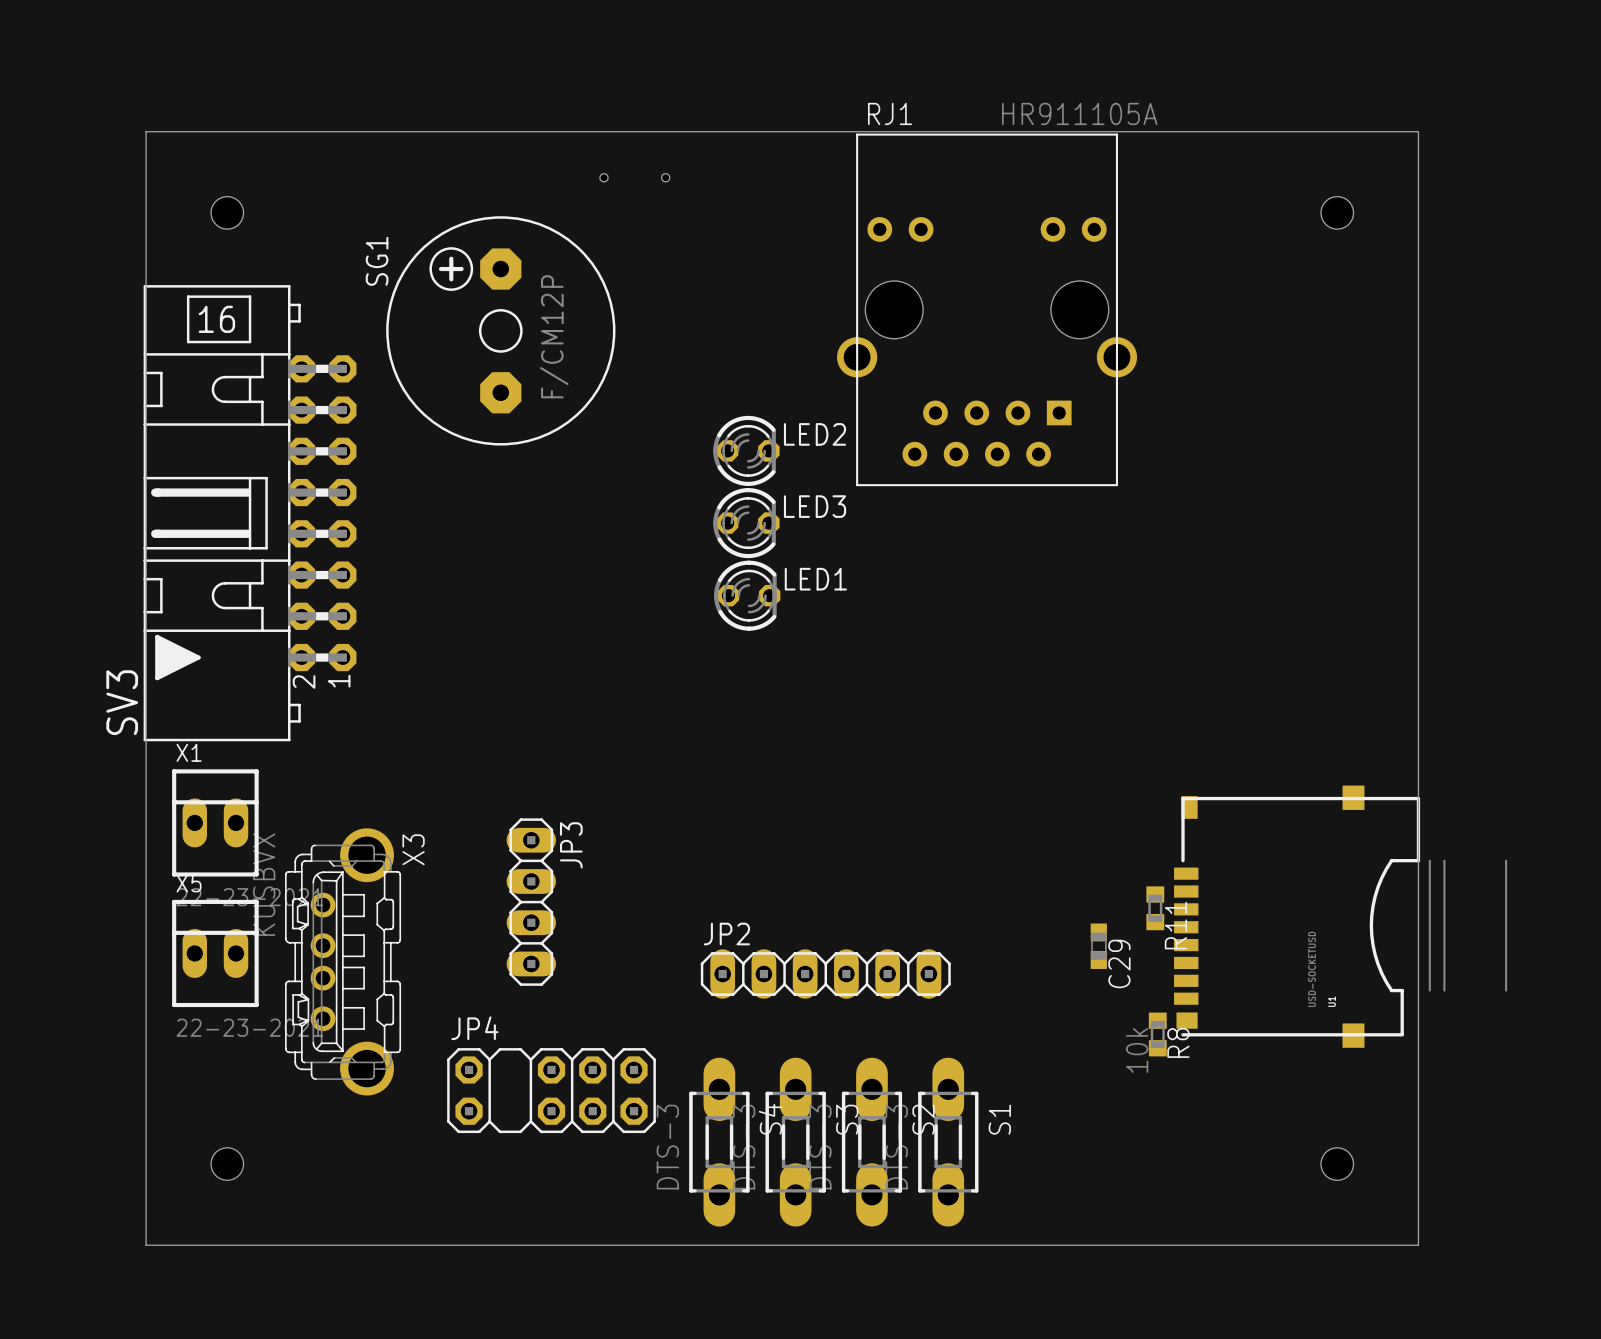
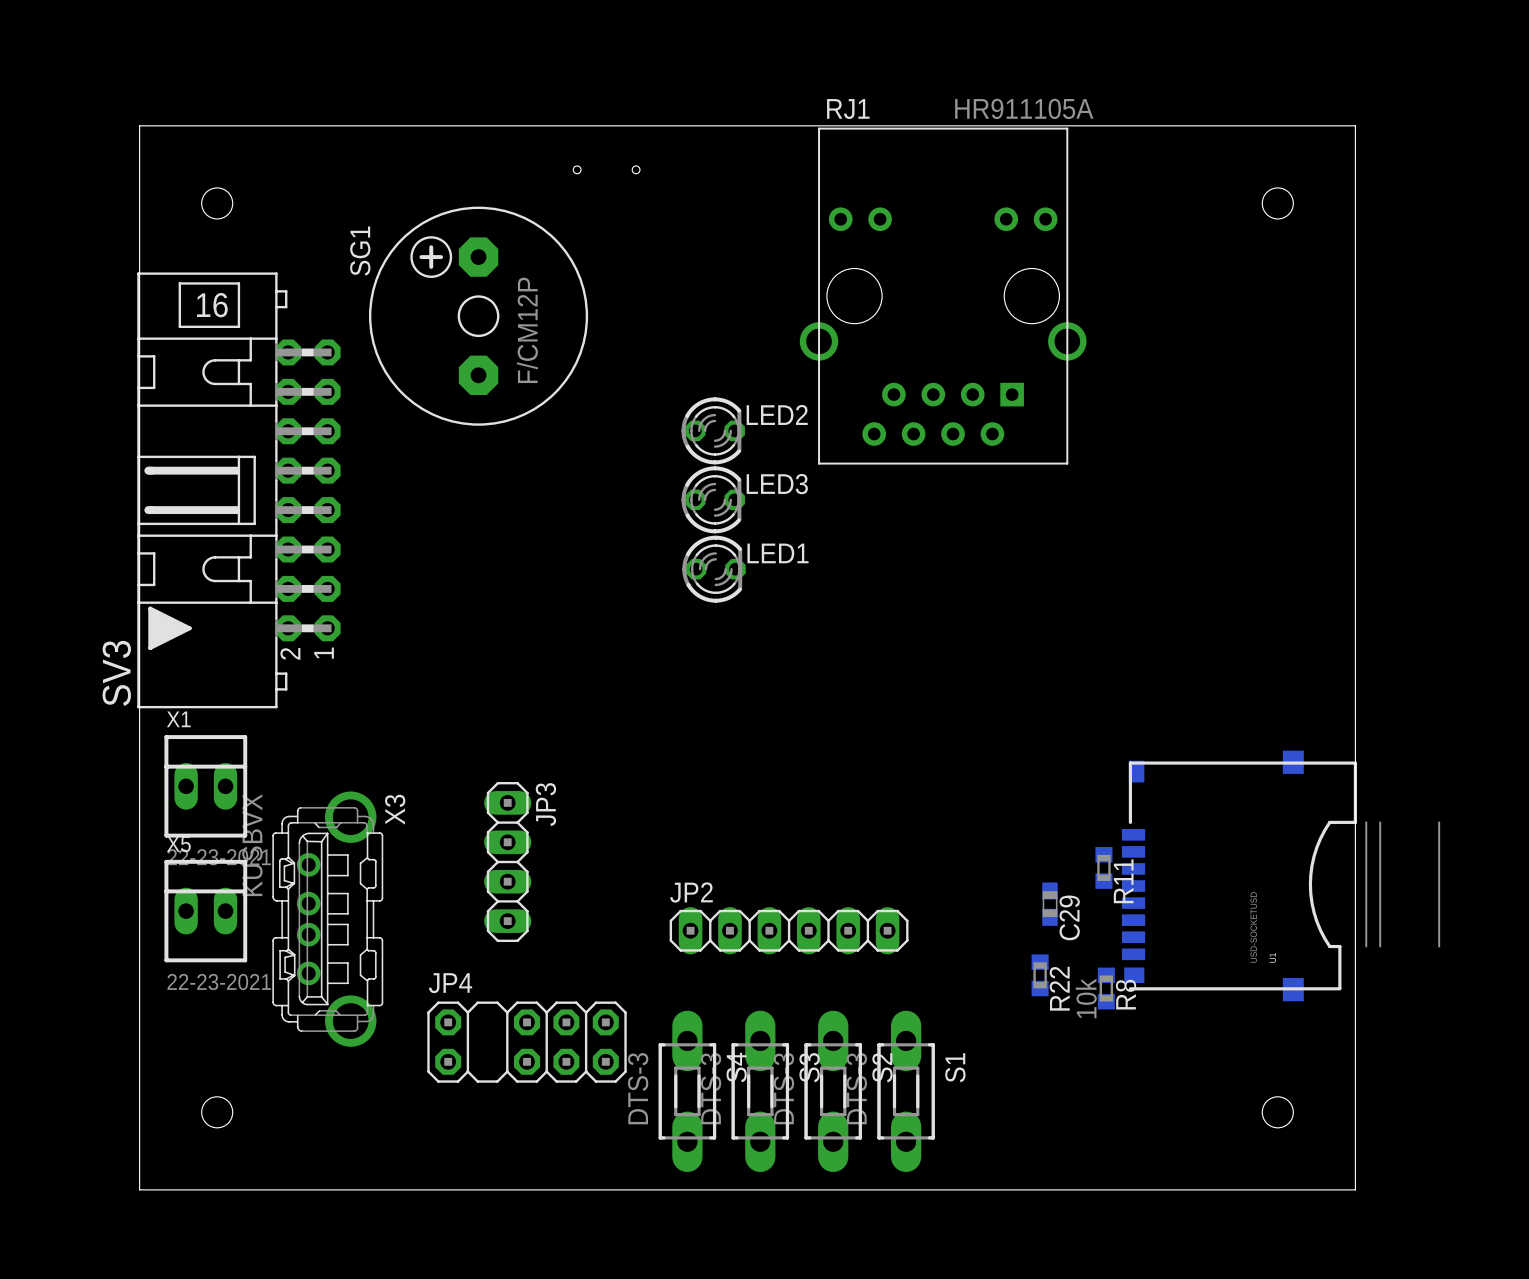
R22: none -> (1040, 975)

